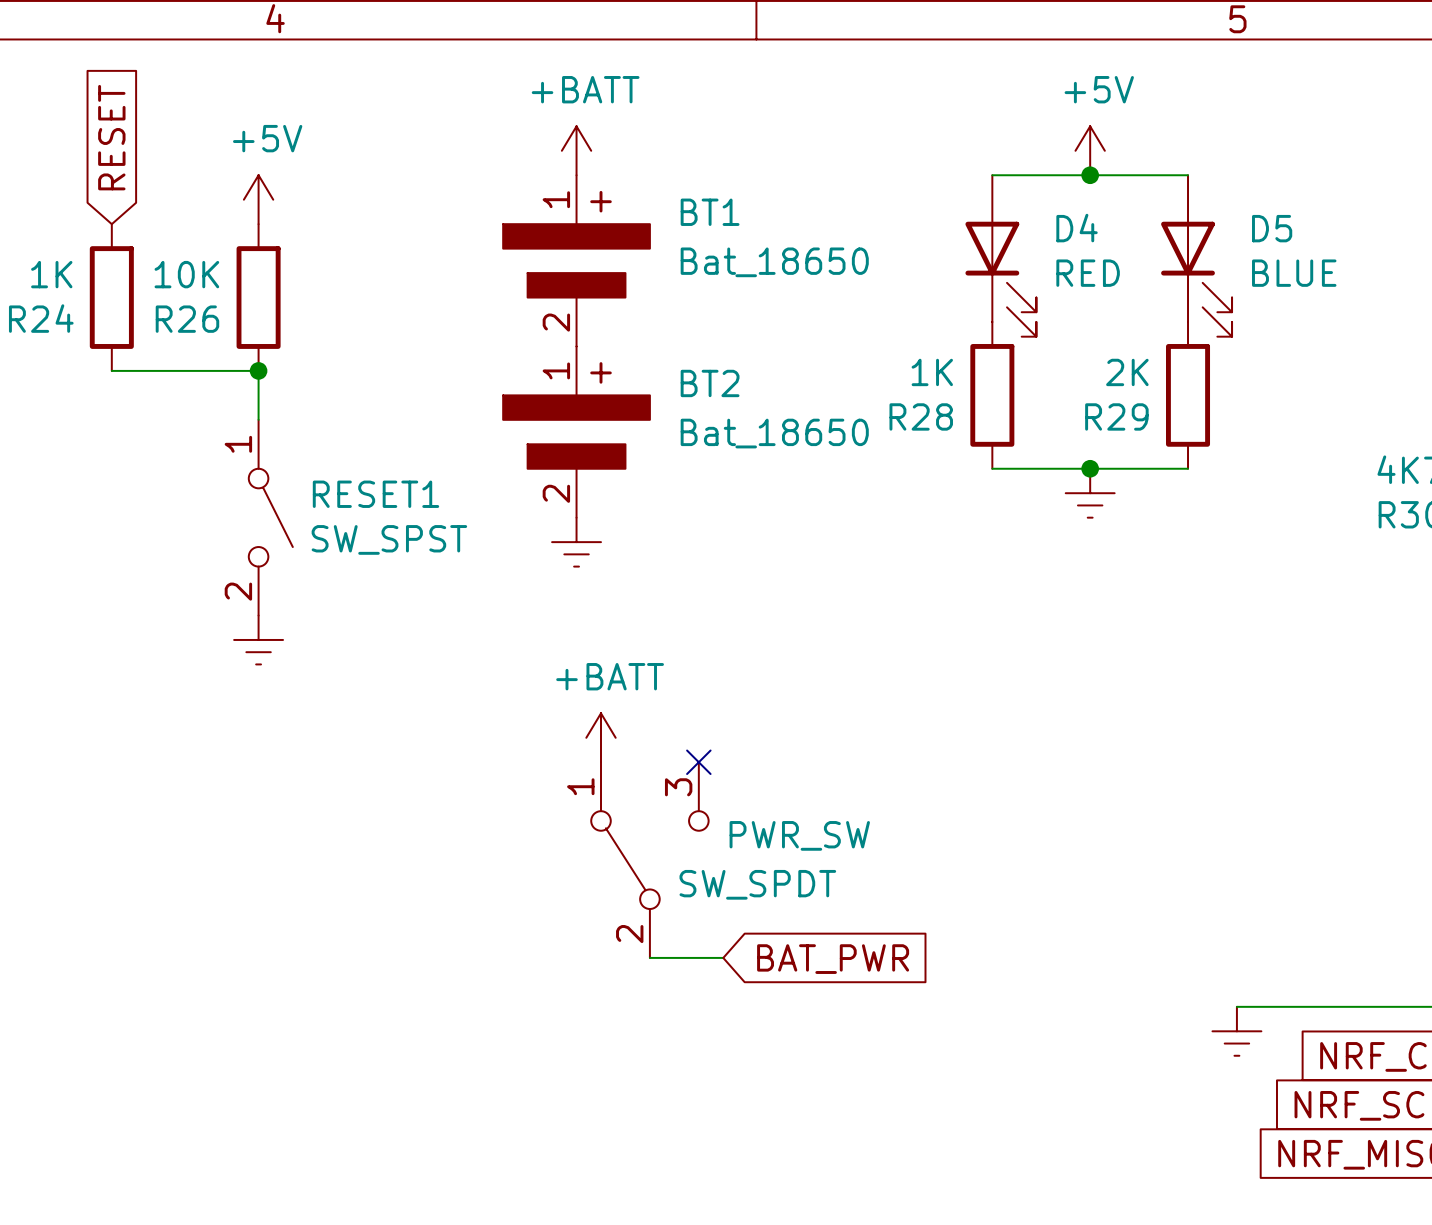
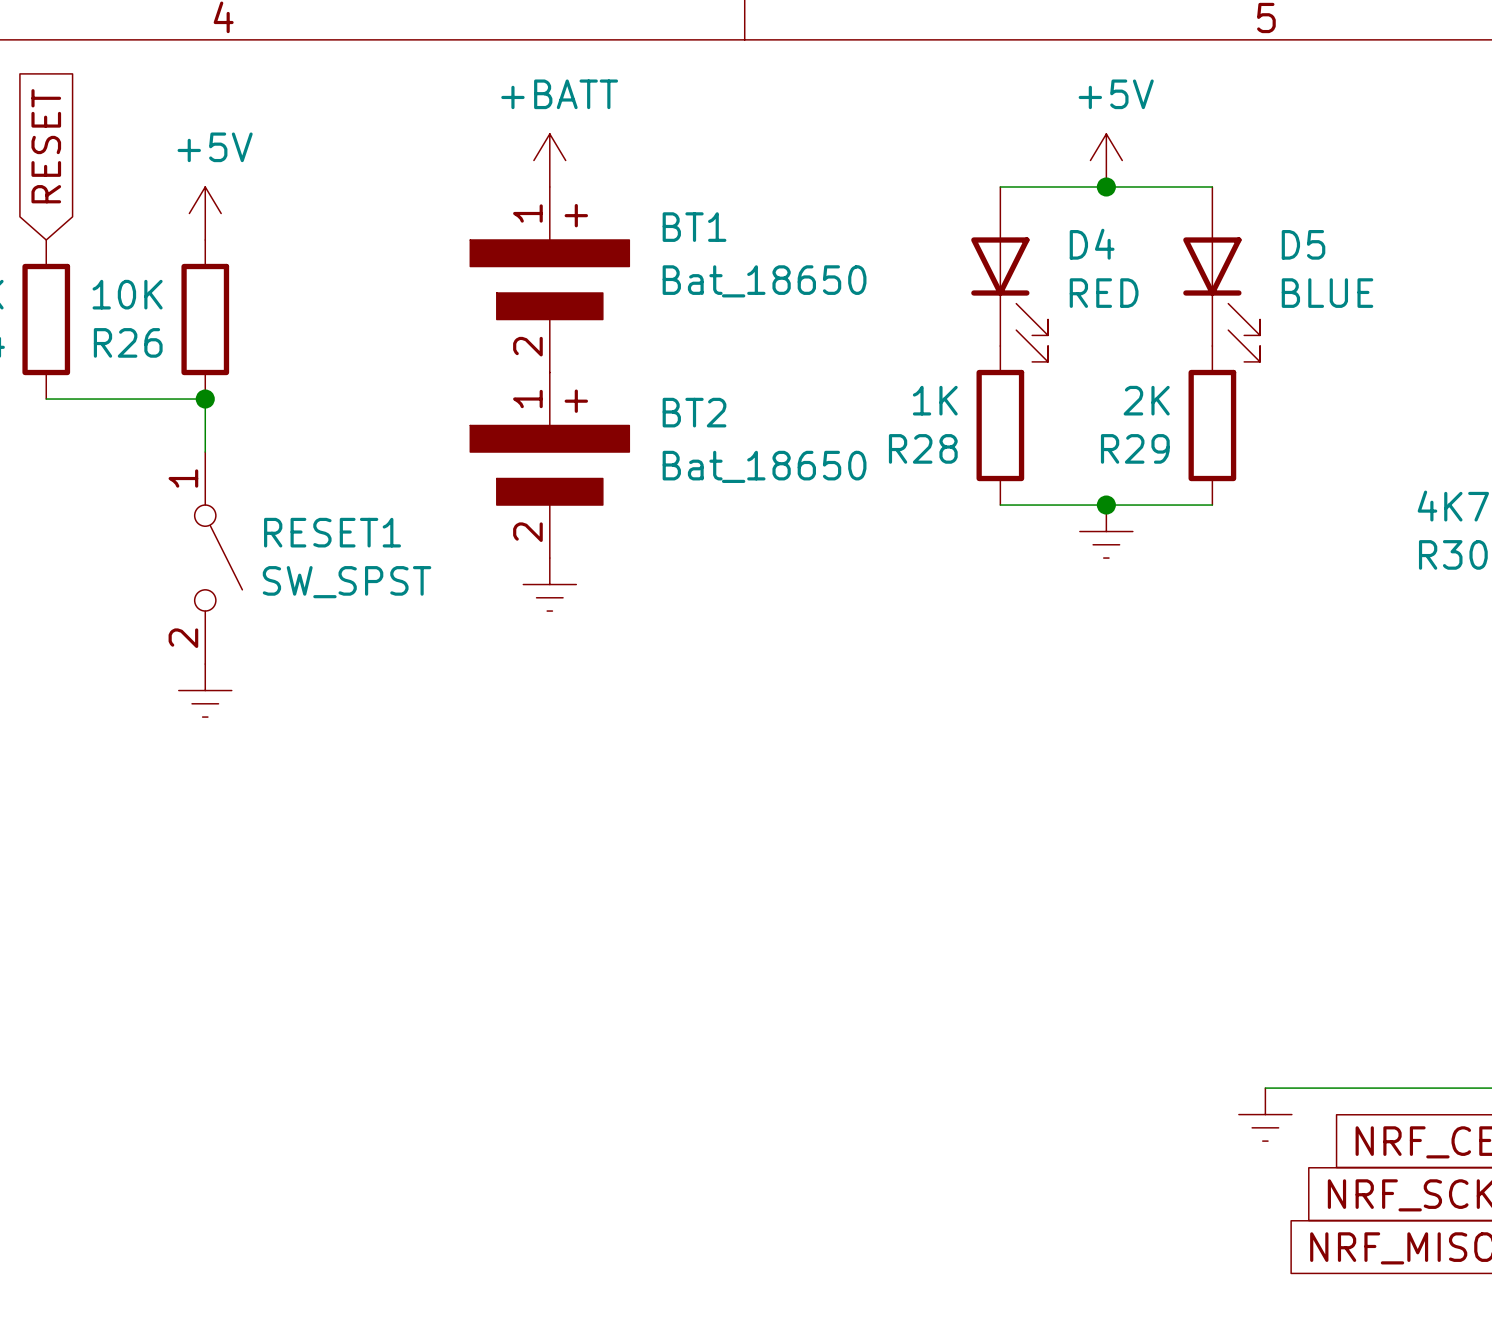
power symbol: +BATT (601, 737) -> none
no-connect mark: (698, 762) -> none
PWR_SW: SW_SPDT (649, 860) -> none
wire: (649, 957) (723, 957) -> none
global label: BAT_PWR (833, 959) -> none

